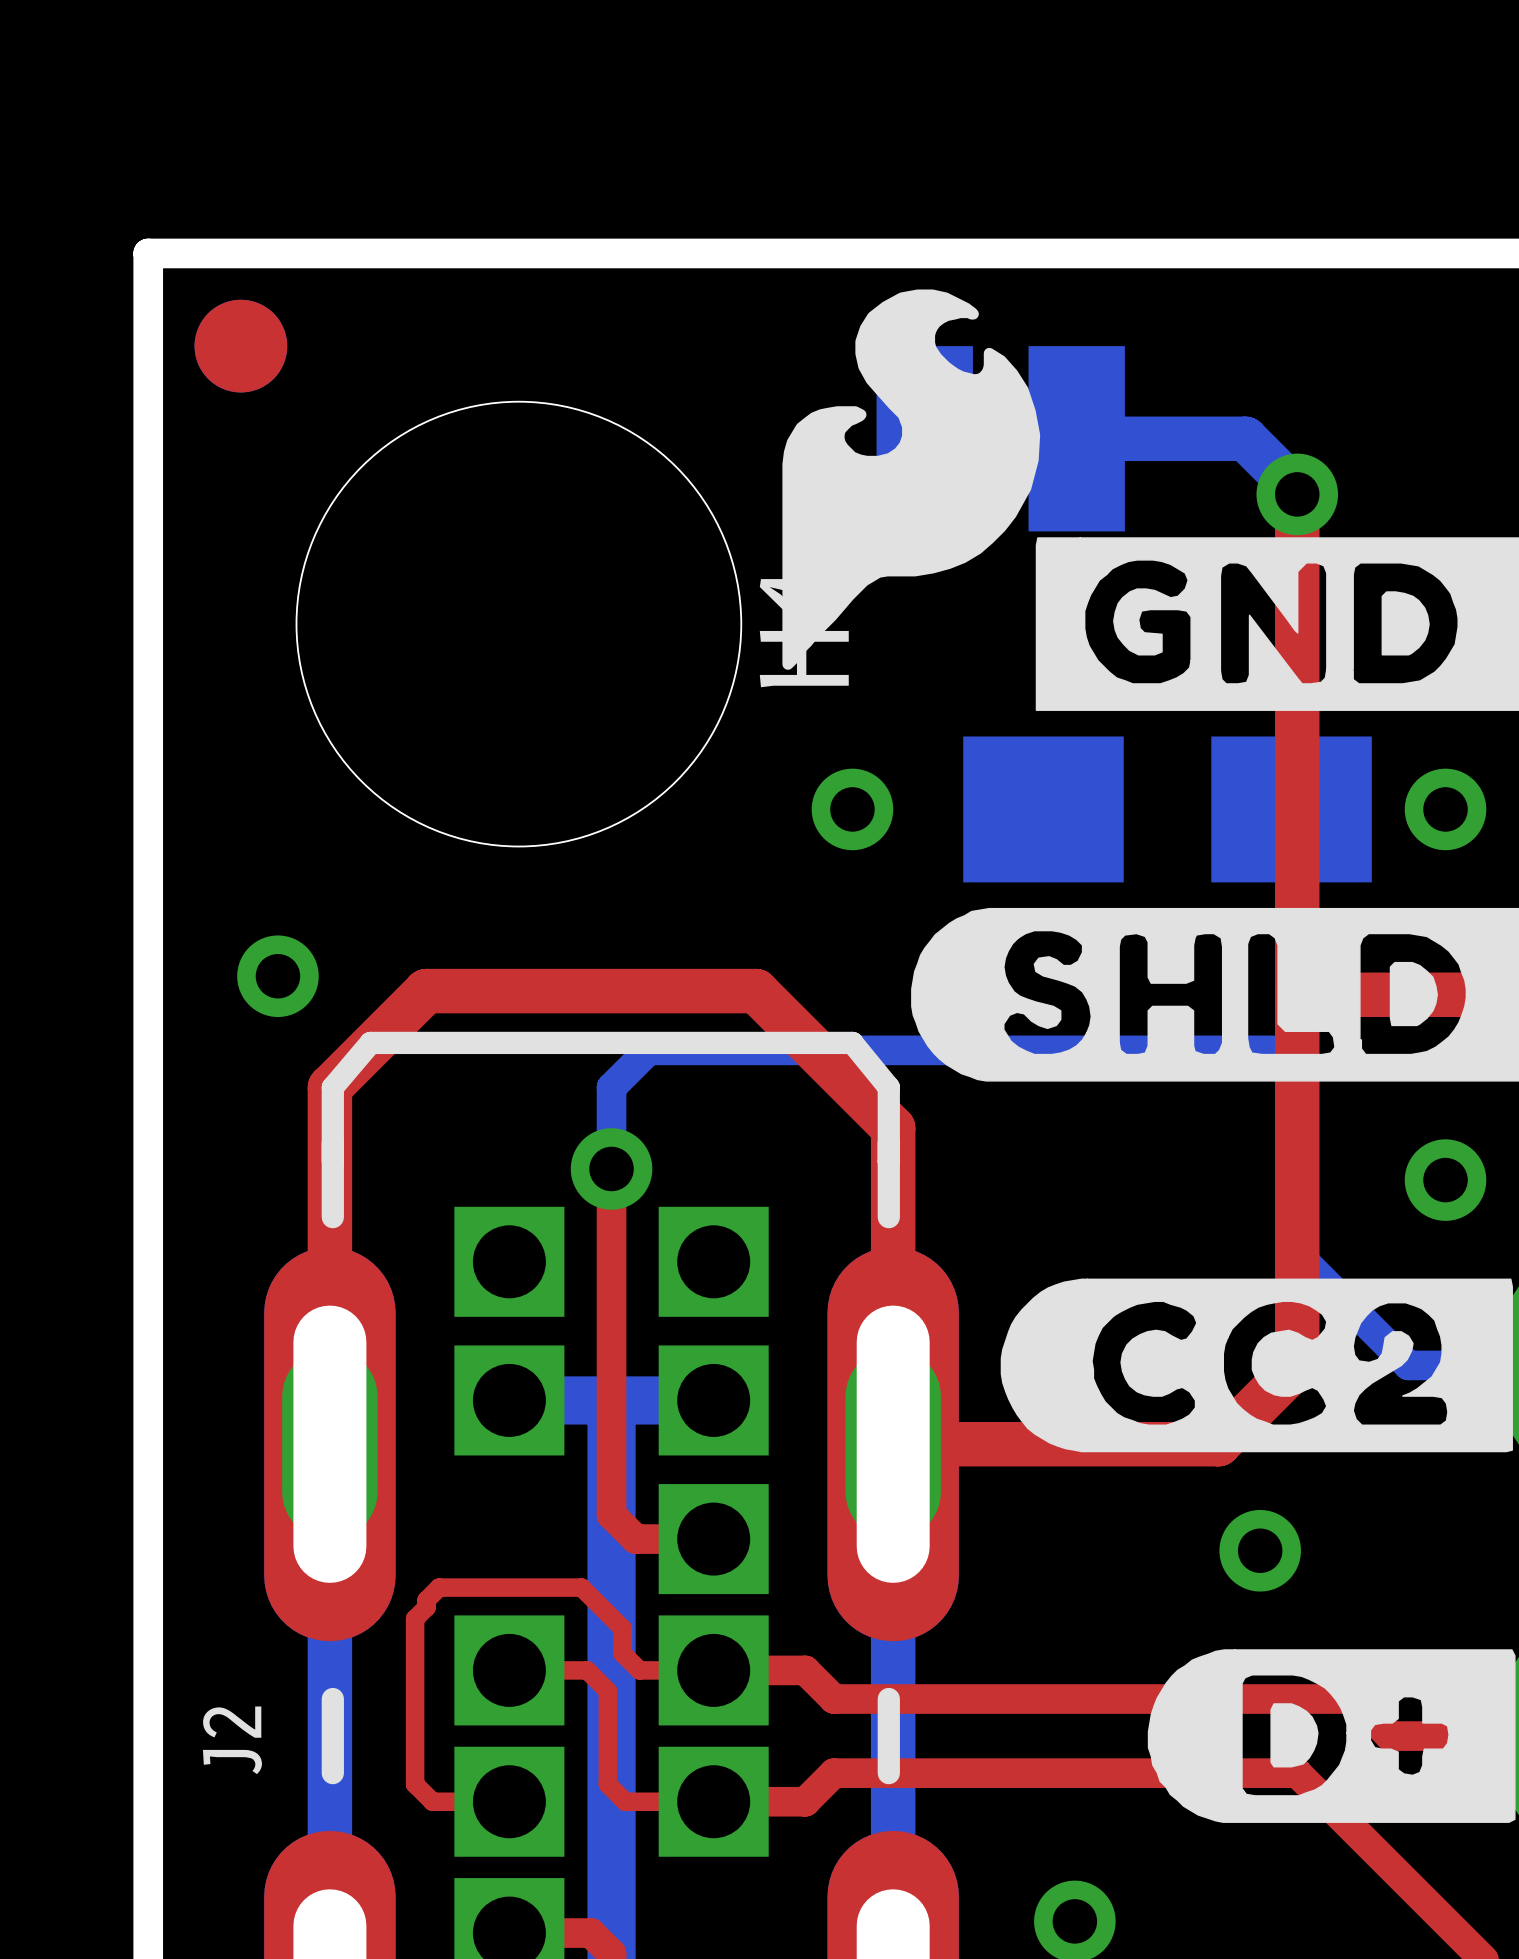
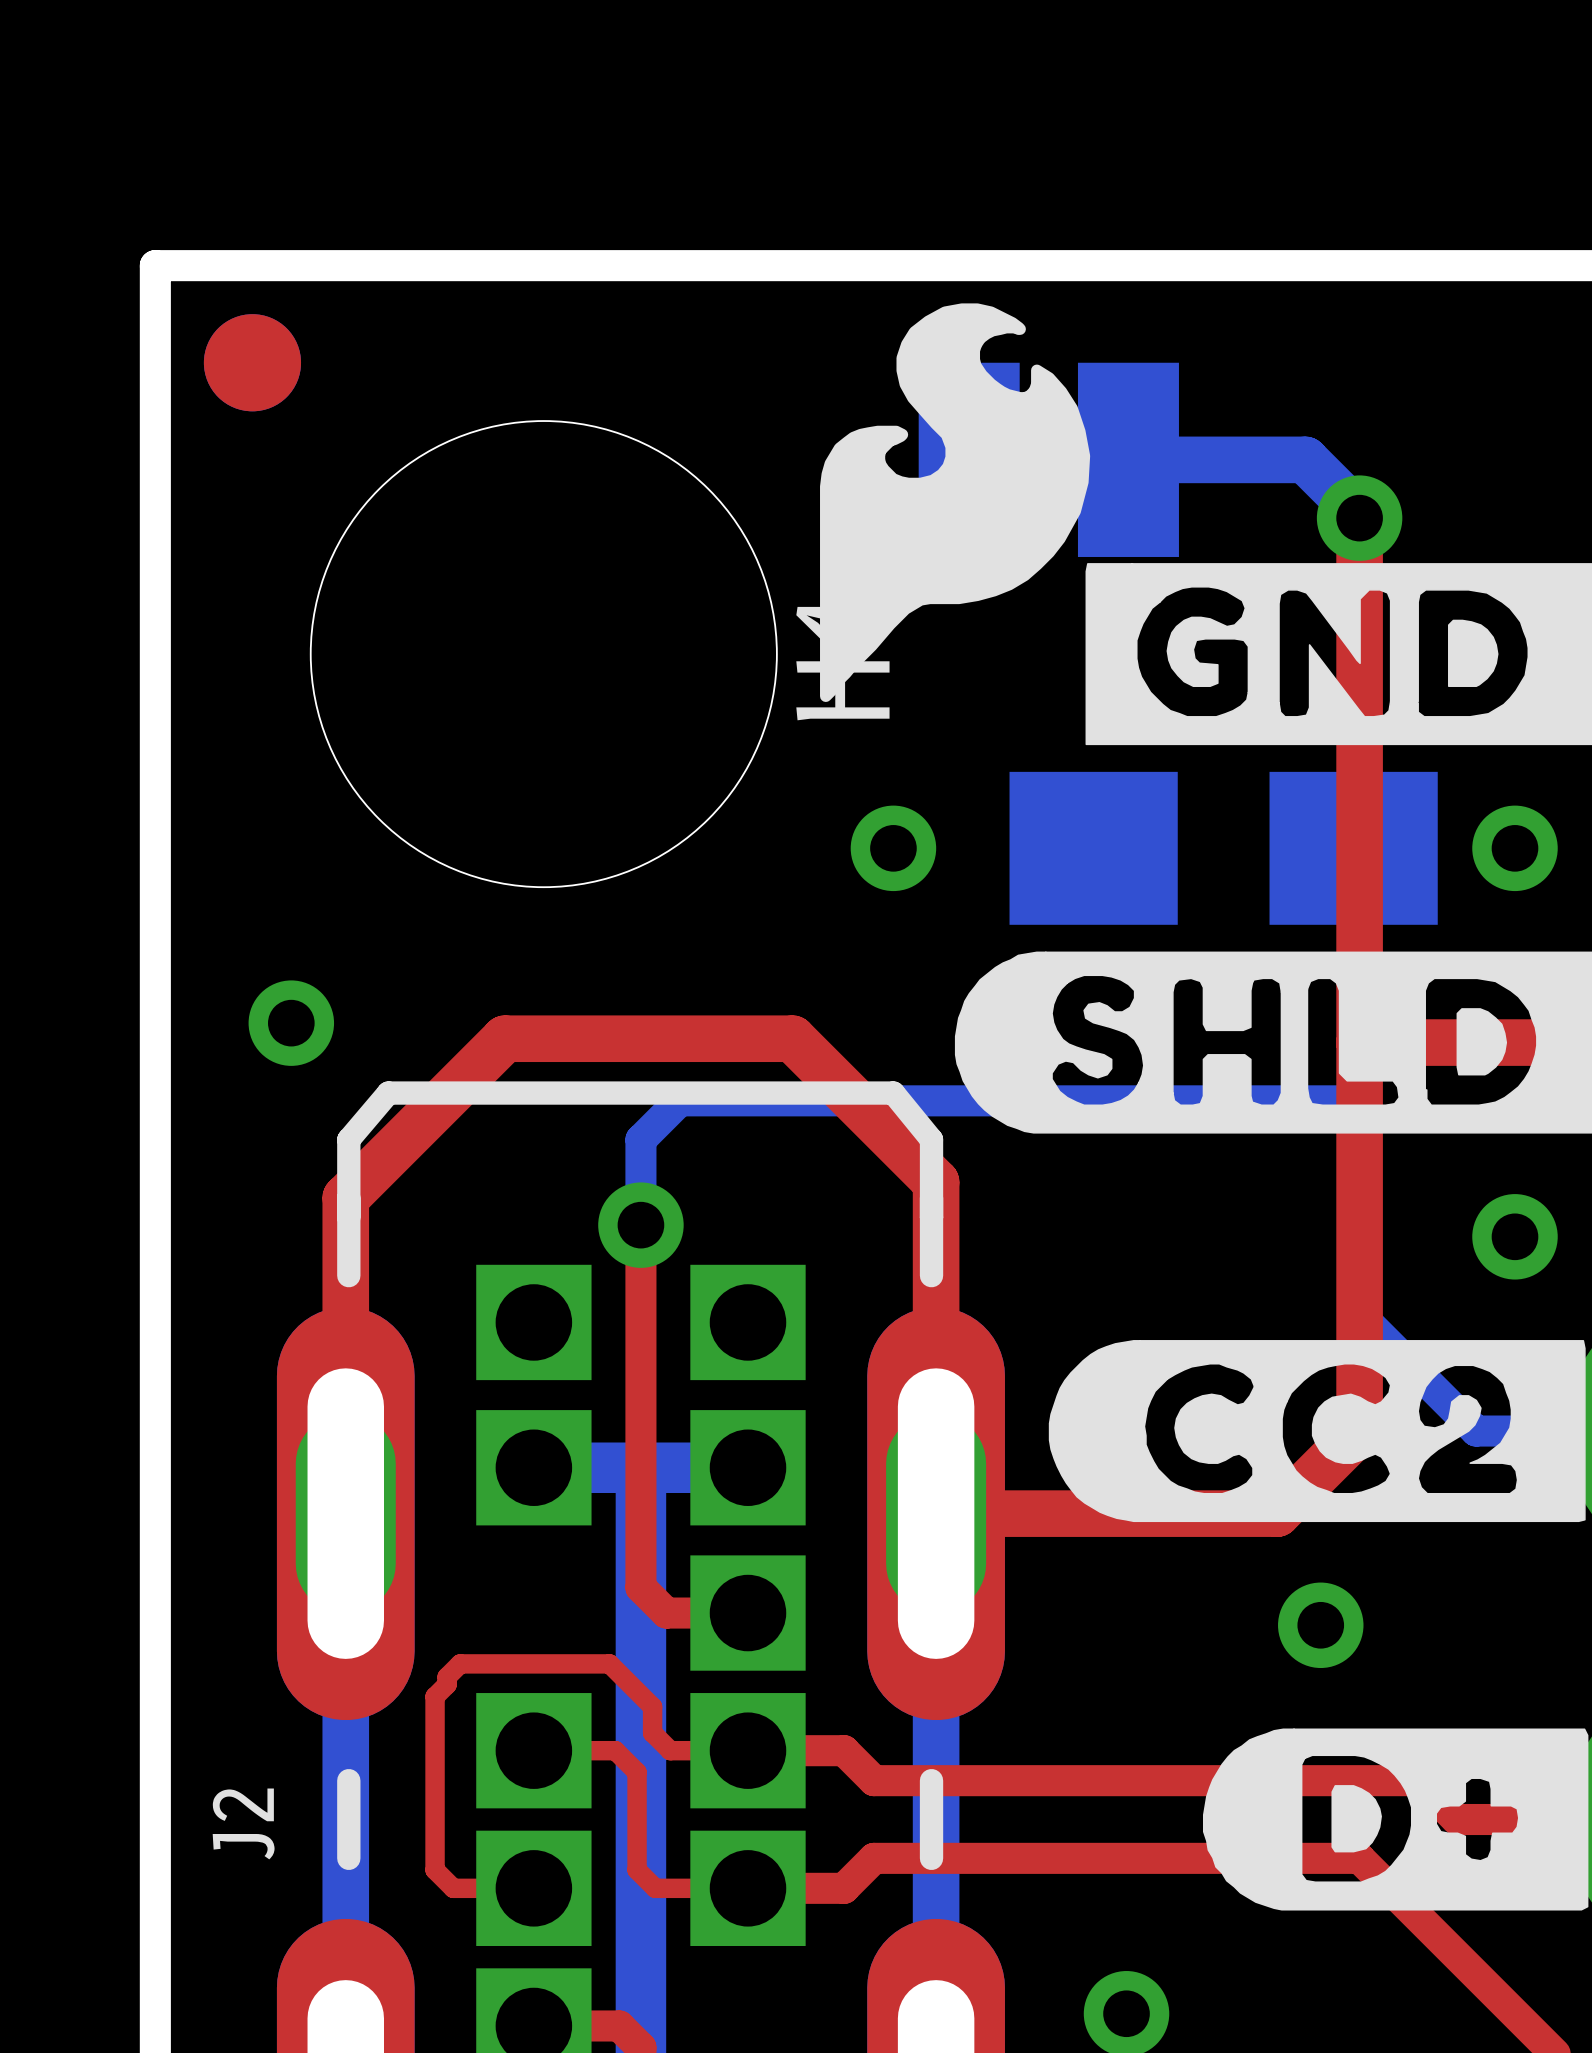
top track: (481, 991) (426, 991) (329, 1087) (329, 1143) -> (505, 1038) (345, 1197)

